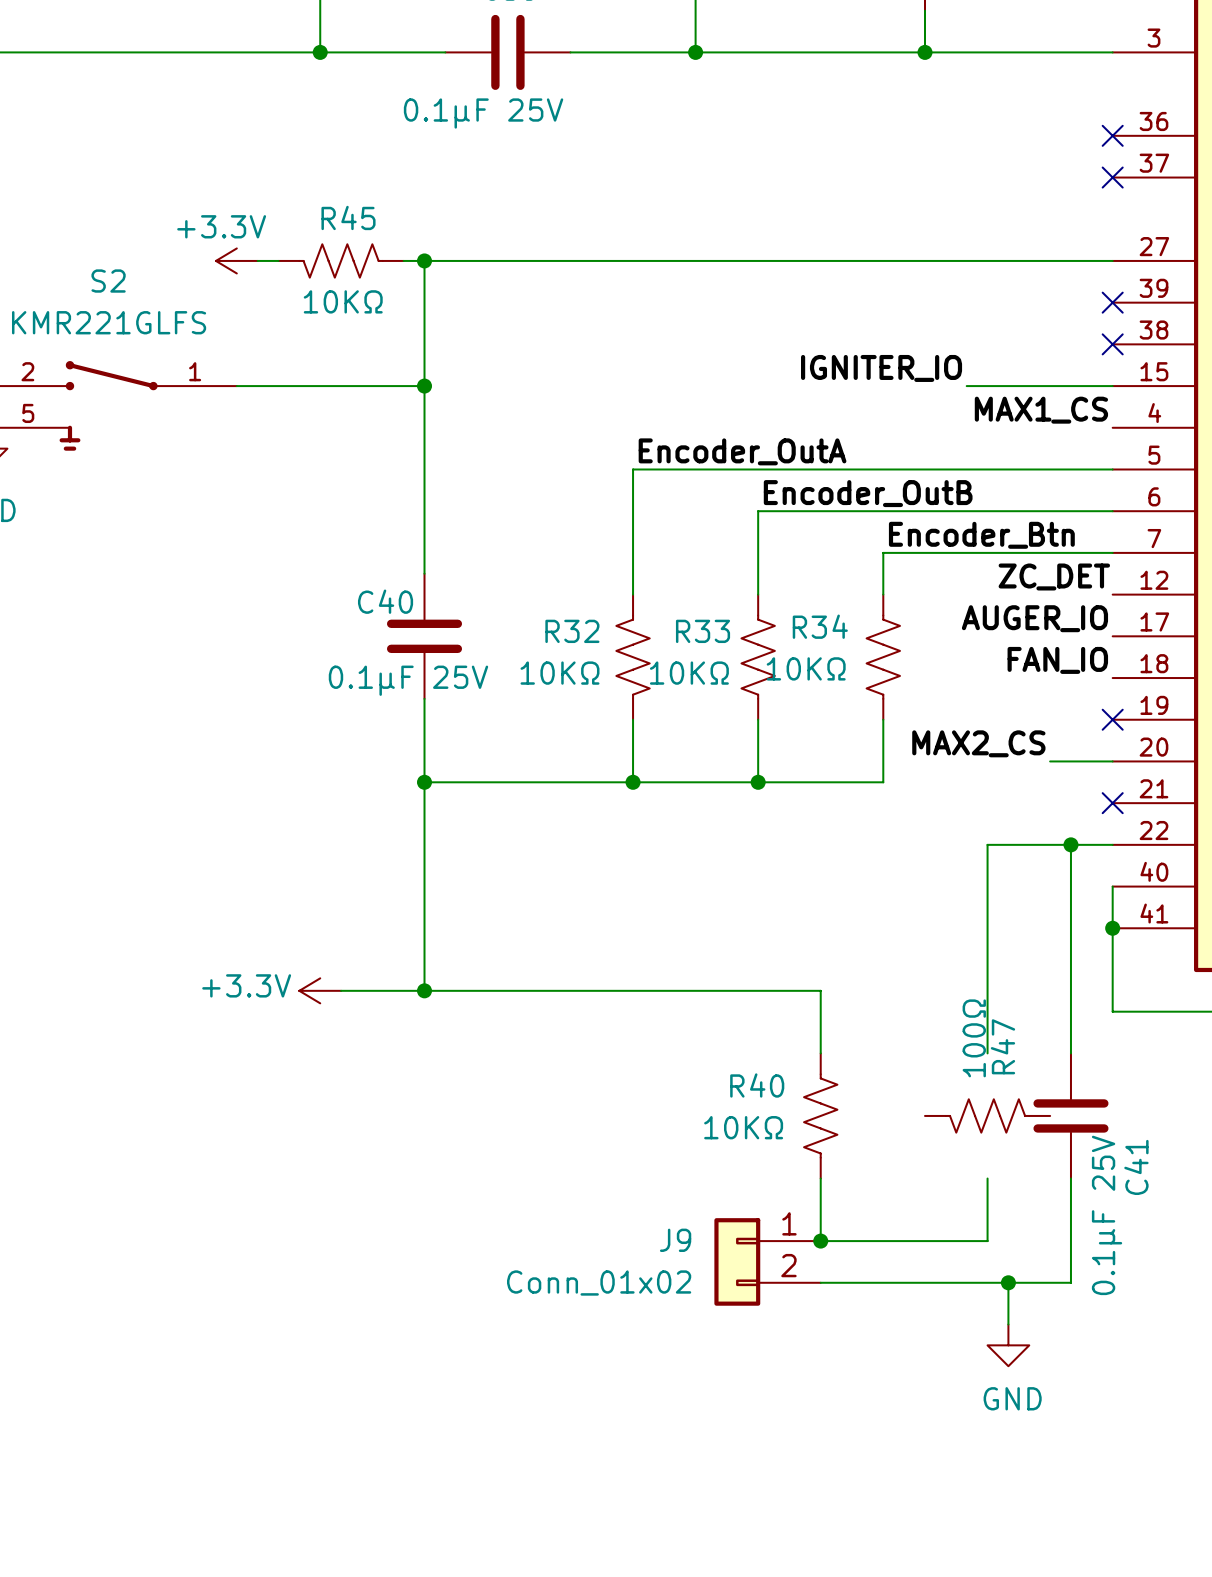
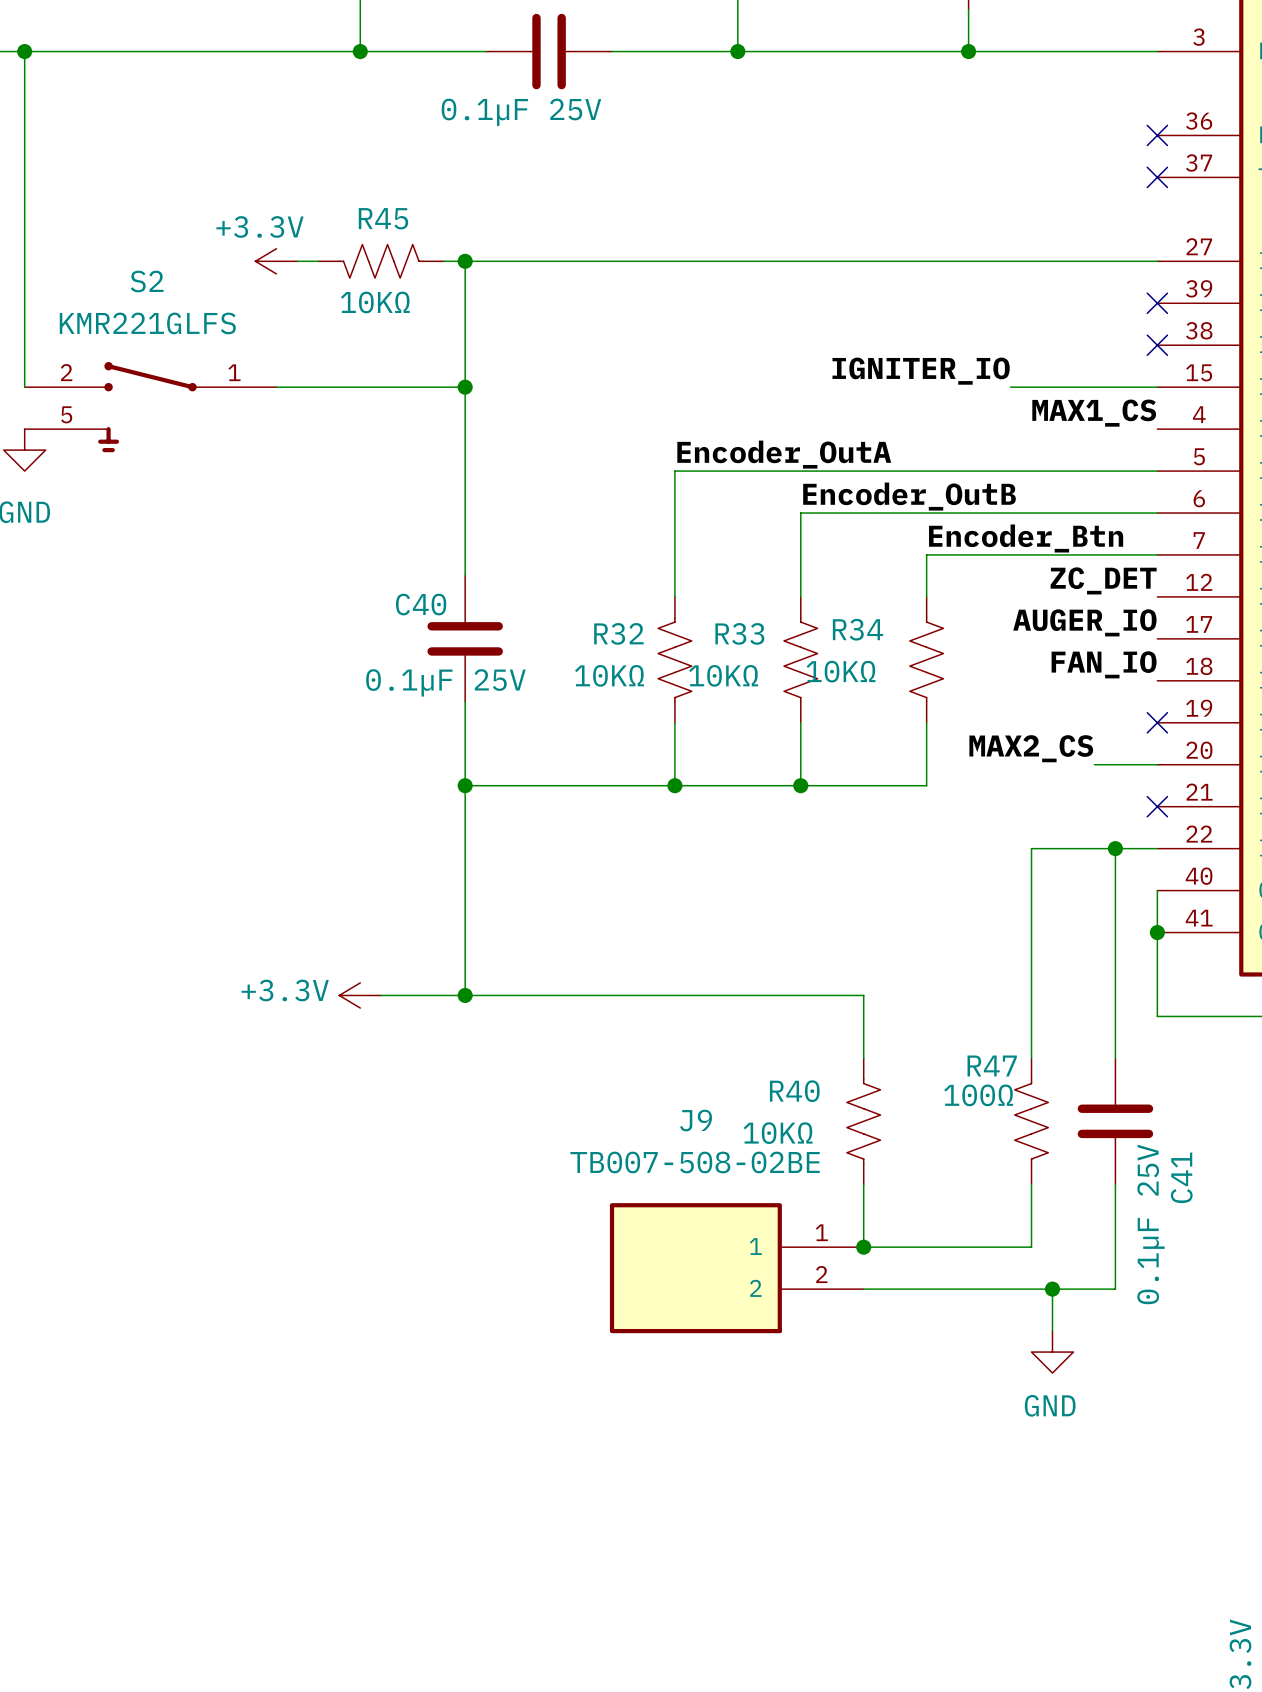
R47 value position: 100Ω (974, 1038) -> 100Ω (978, 1095)
R47 name position: R47 (1002, 1046) -> R47 (992, 1066)
R47 rotation: 0° (987, 1115) -> 90° clockwise (1031, 1121)
J9 symbol: [714, 1218, 821, 1306] -> [609, 1203, 864, 1334]
J9 name position: J9 (675, 1240) -> J9 (696, 1120)
J9 value: Conn_01x02 (599, 1283) -> TB007-508-02BE (695, 1162)

